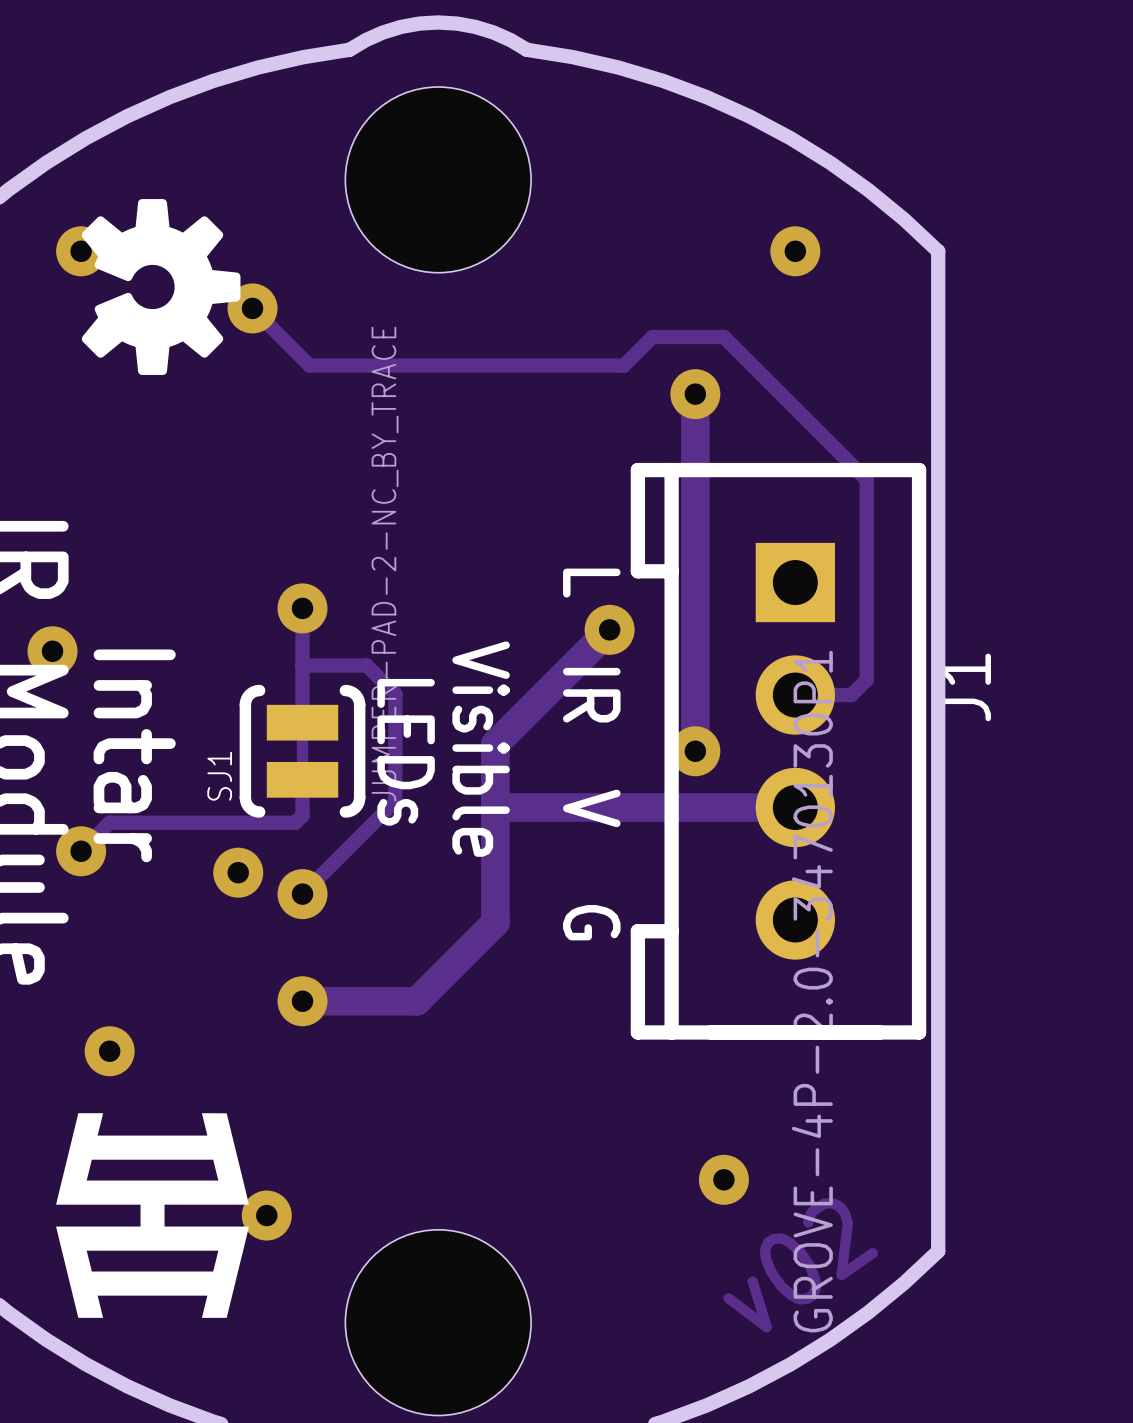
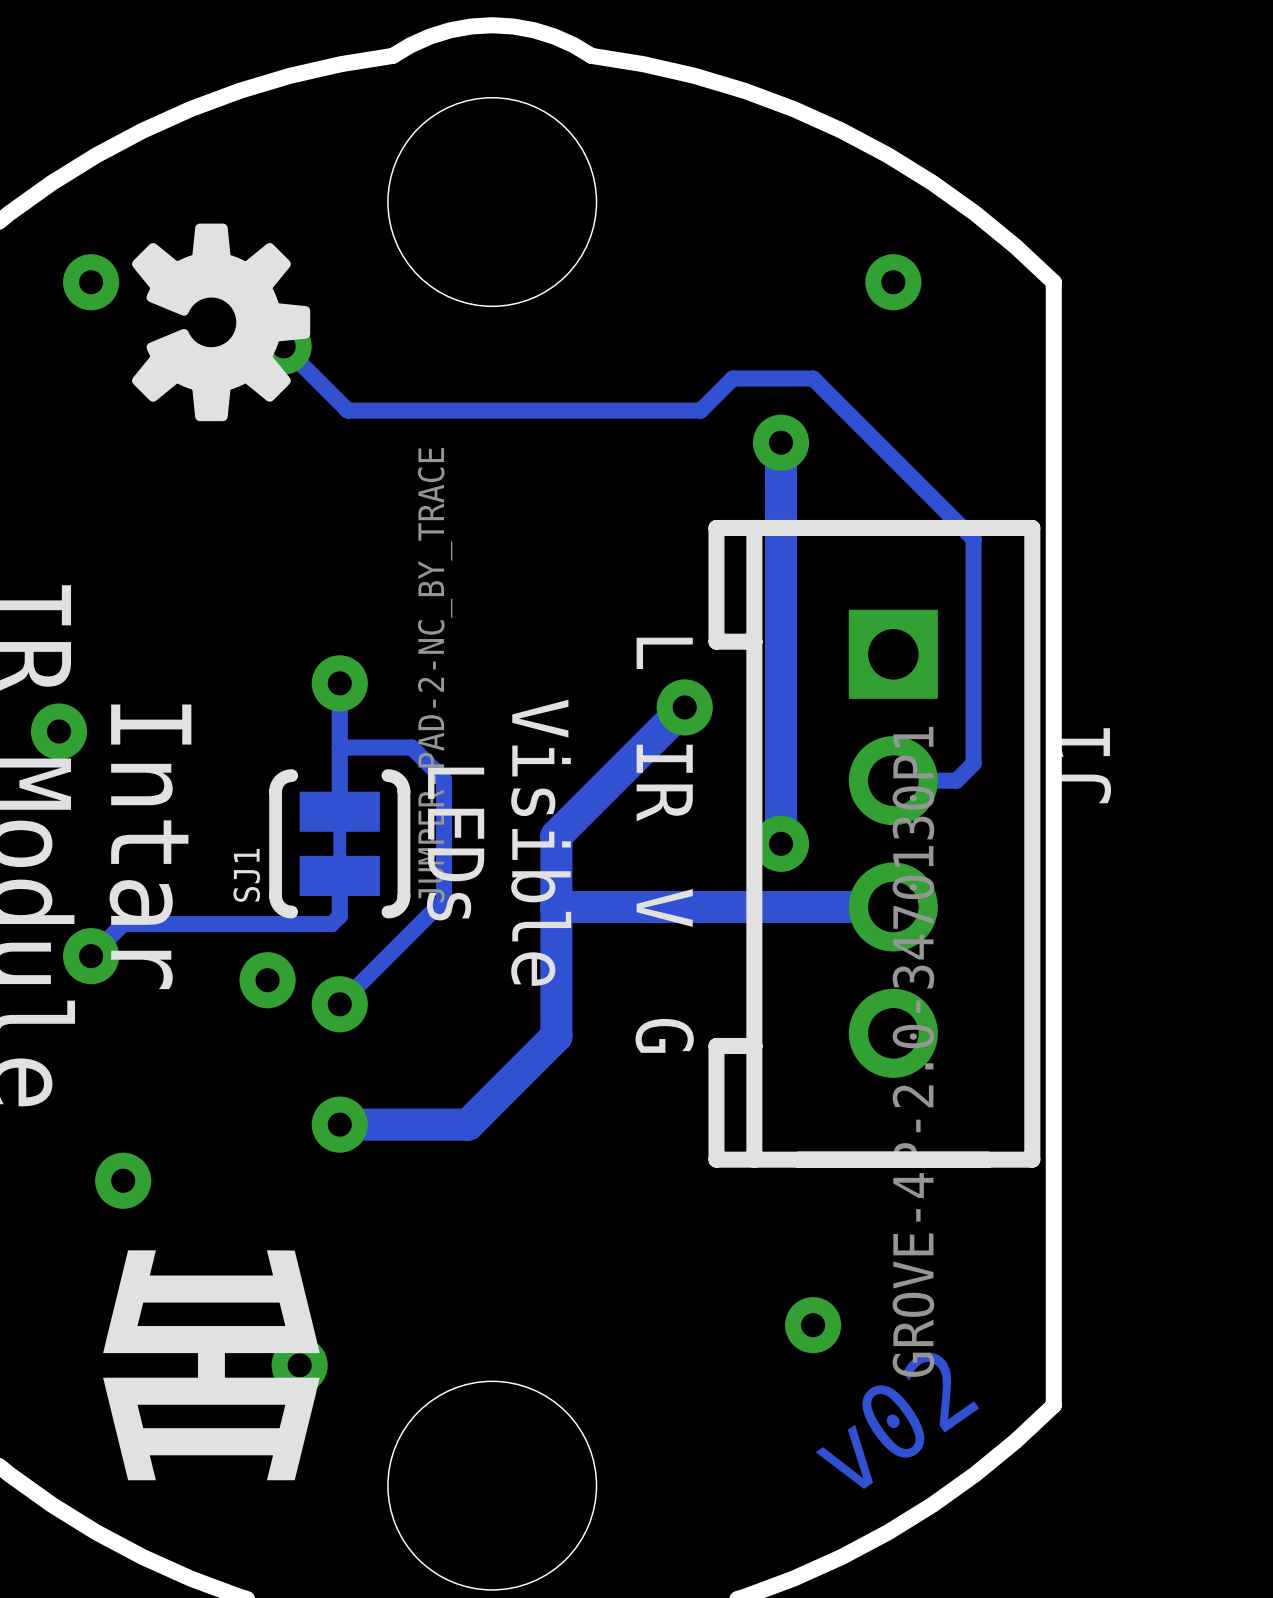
drawing position: (161, 287) -> (221, 322)
drawing position: (152, 1215) -> (211, 1365)

